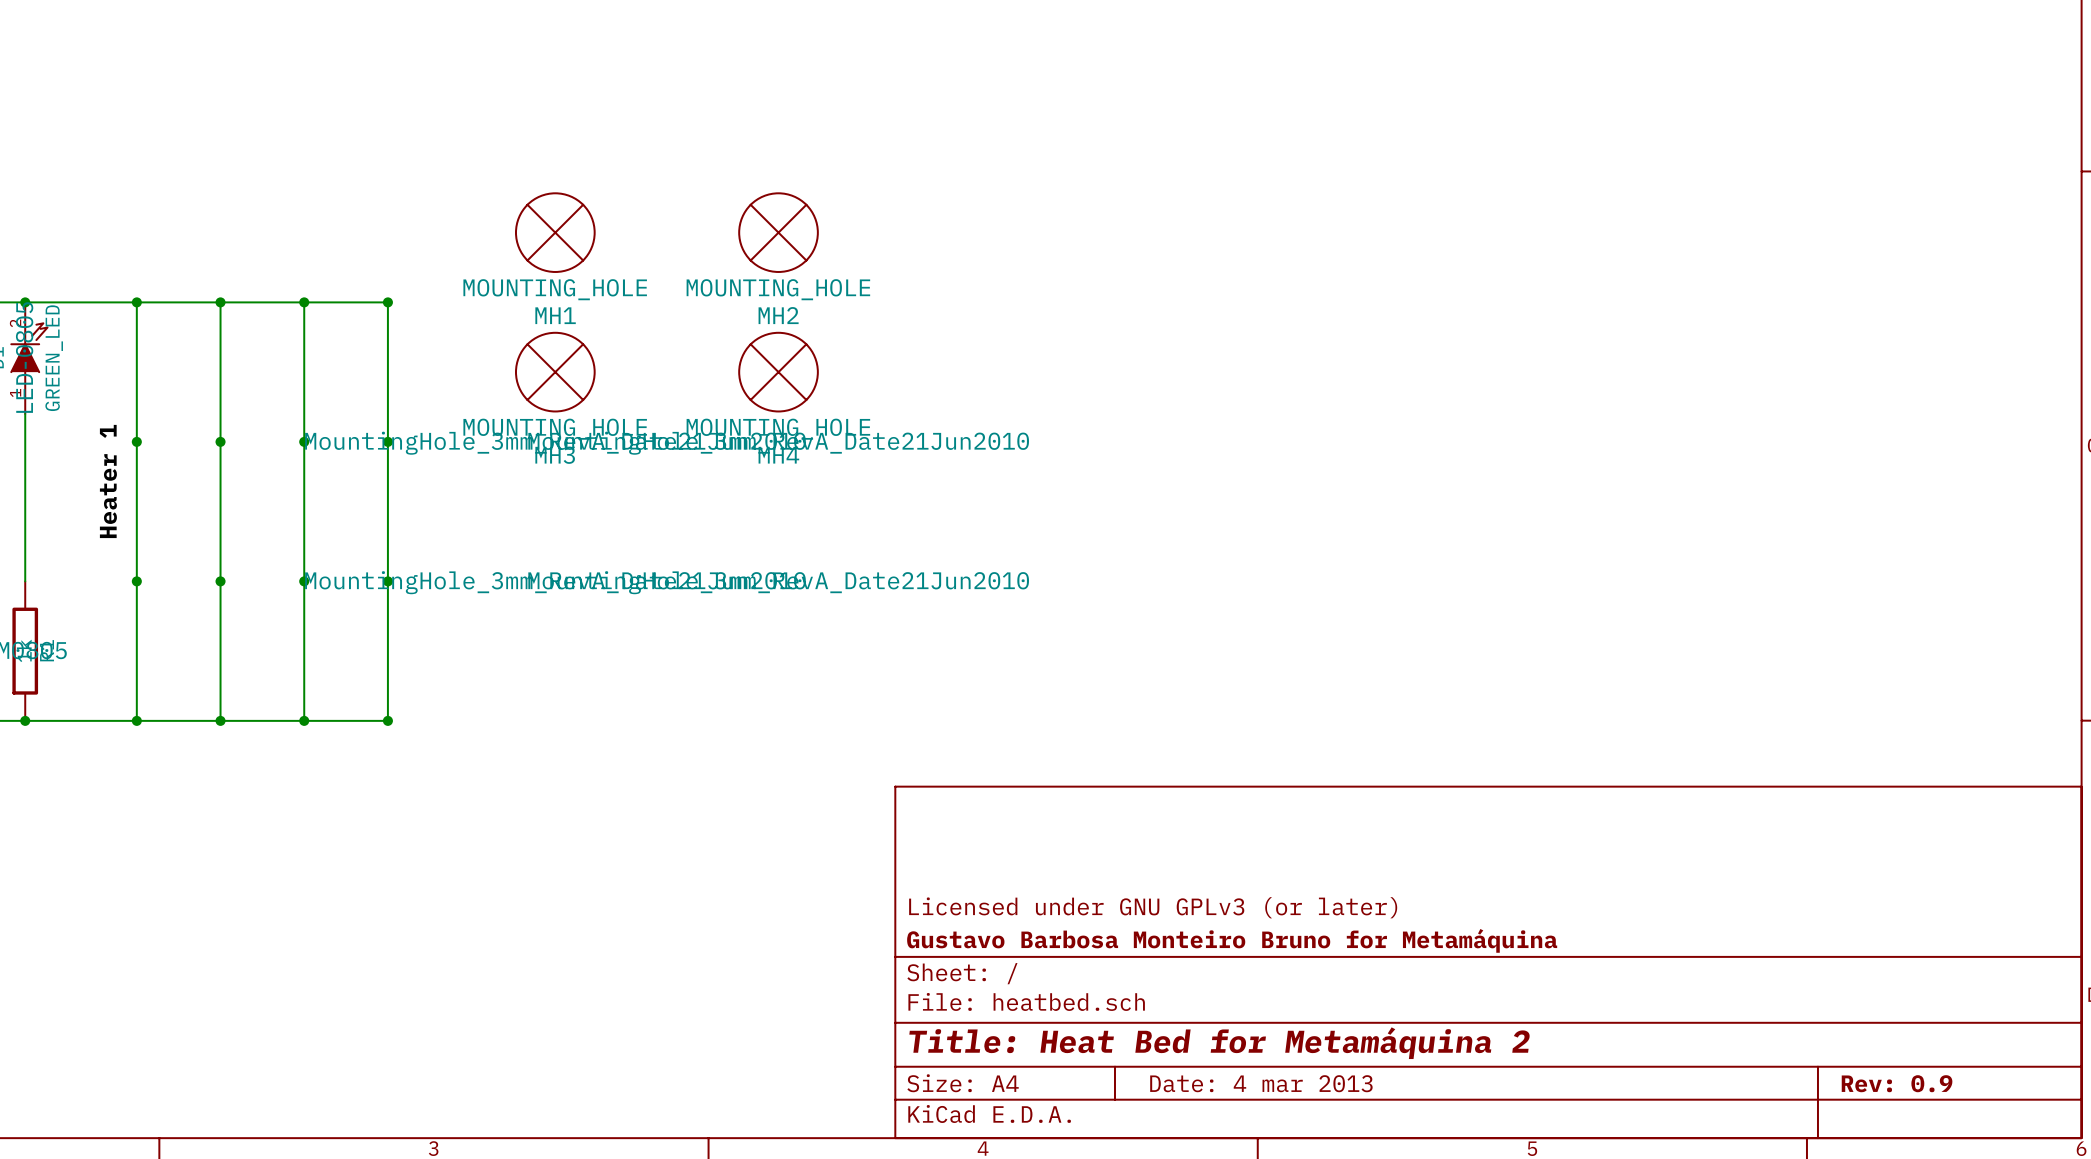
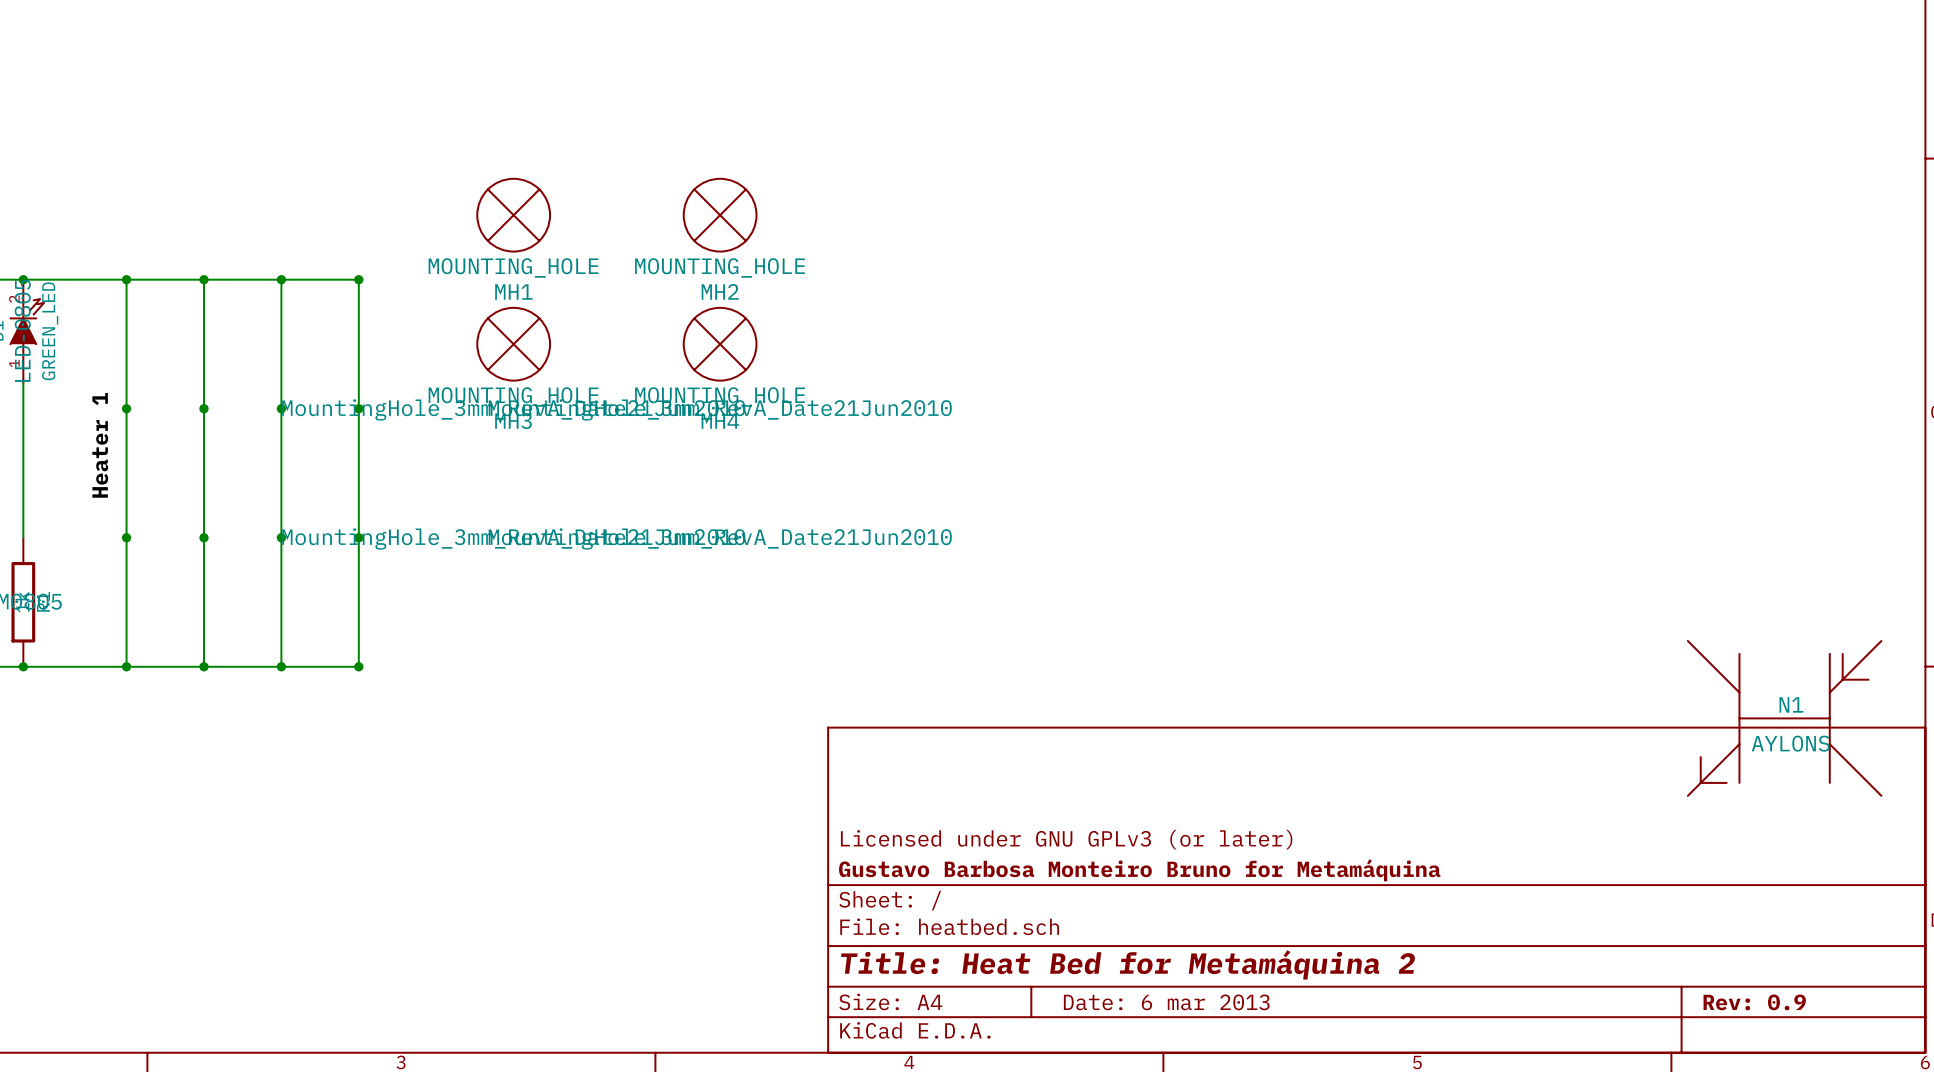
N1: none -> AYLONS (1784, 718)
title block: Date: 4 mar 2013 (1261, 1083) -> Date: 6 mar 2013 (1166, 1002)

